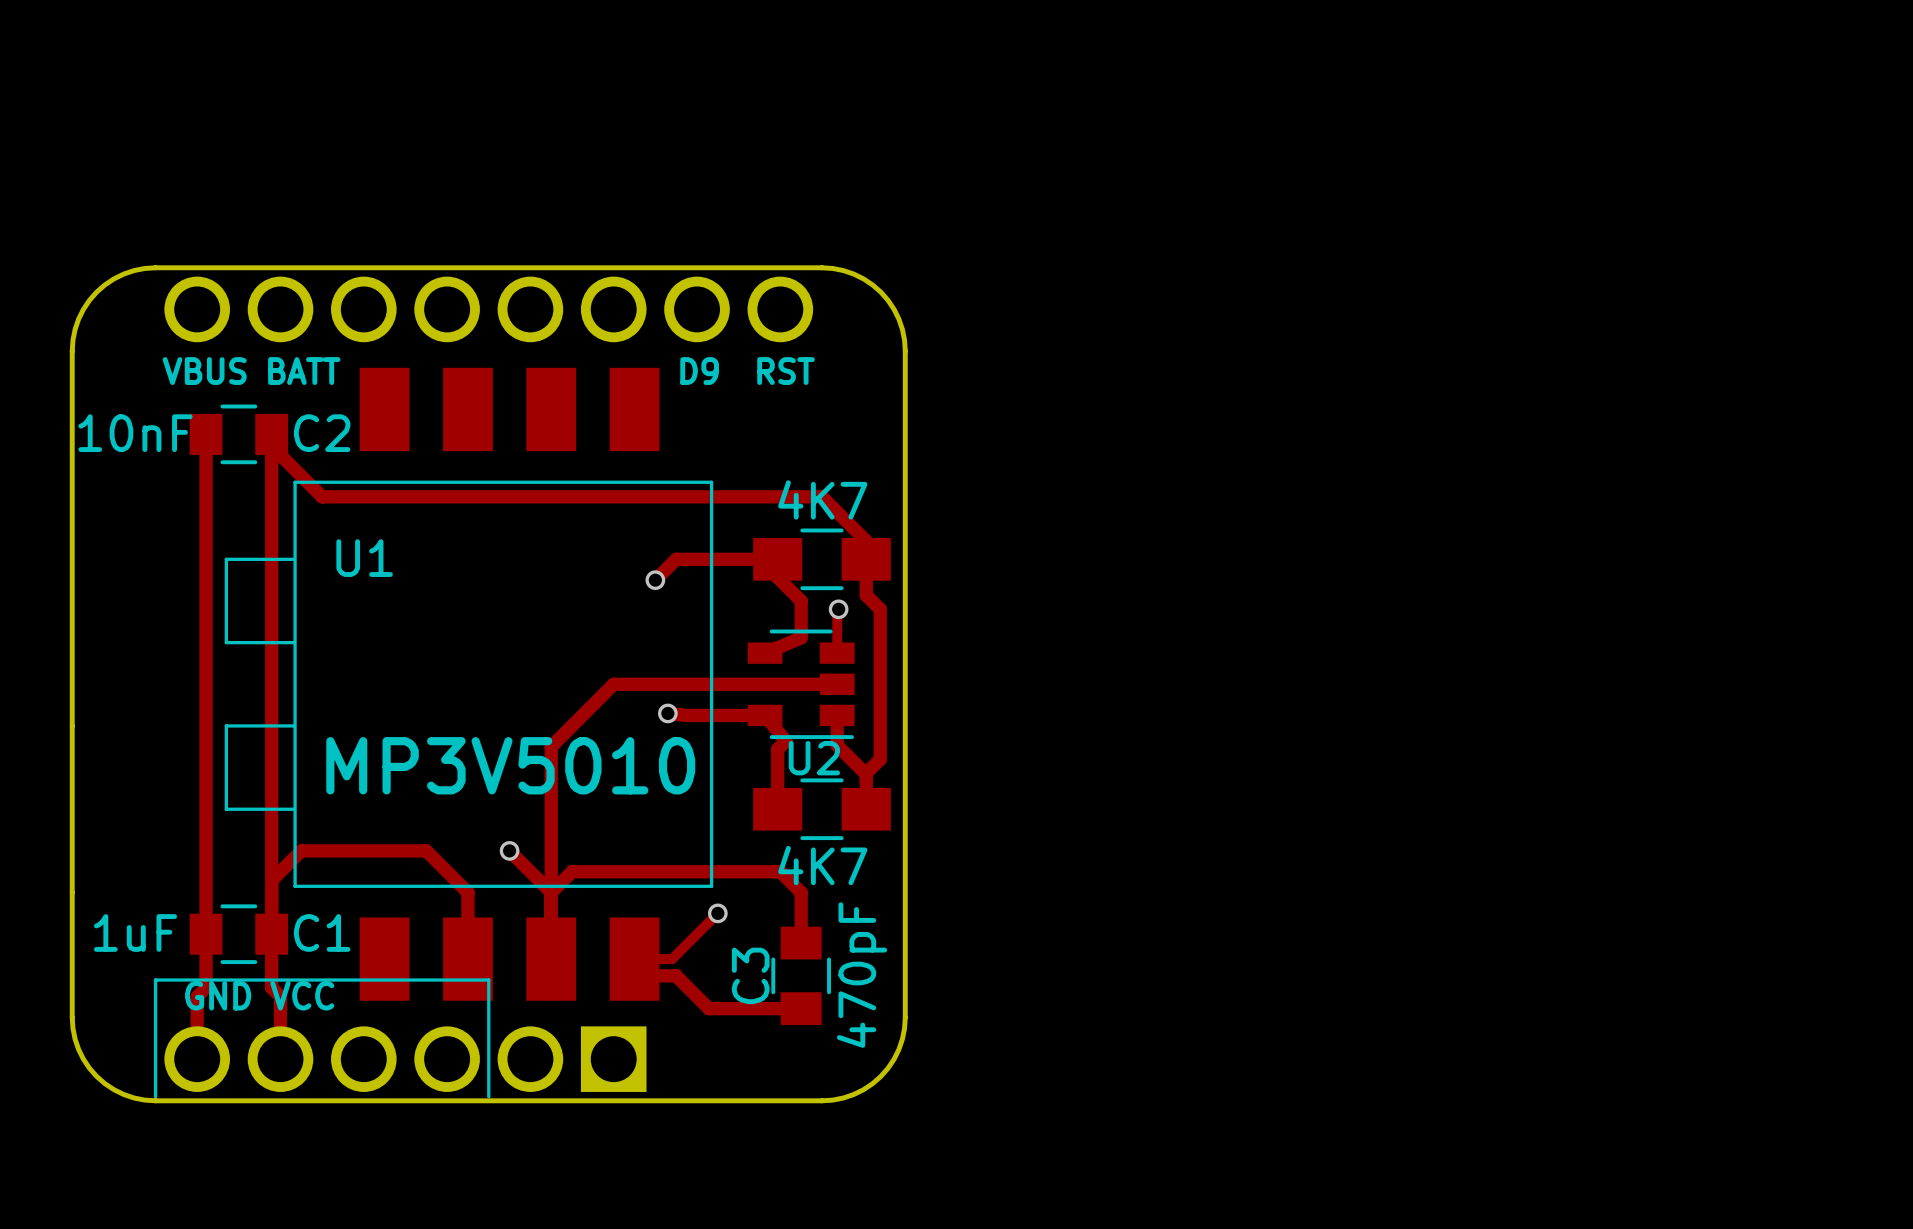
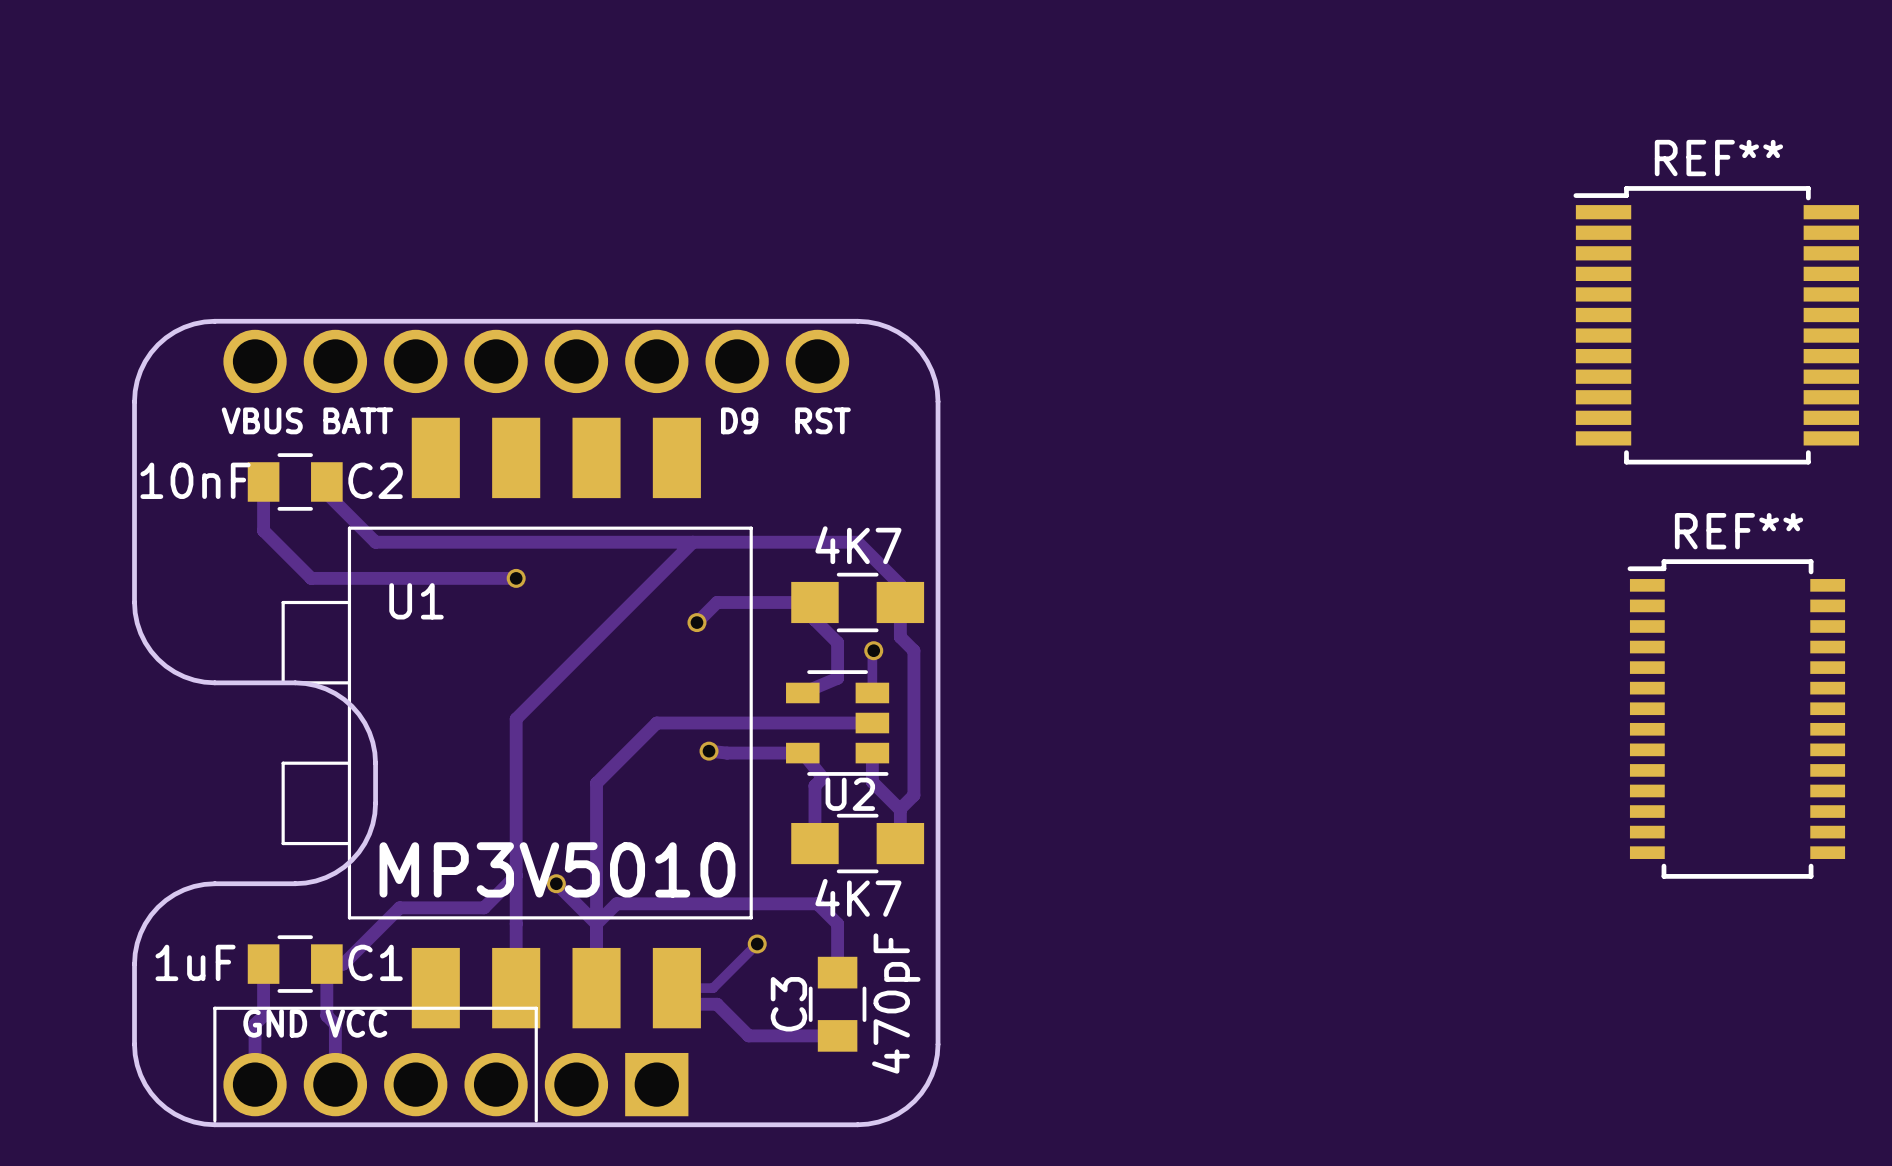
REF**: none -> (1716, 325)
track: (271, 446) (271, 934) -> (516, 875) (484, 907) (399, 907) (343, 964) (326, 964)
track: (206, 484) (206, 934) -> (263, 530) (311, 578) (516, 578)
via: none -> (516, 578)
board edge: (72, 559) (72, 934) -> (134, 602) (137, 623) (151, 651) (165, 666) (184, 676) (214, 682) (305, 683) (335, 693) (352, 706) (364, 723) (372, 742) (375, 763) (375, 803) (372, 824) (364, 843) (344, 867) (325, 877) (305, 883) (214, 883) (184, 889) (165, 900) (151, 915) (137, 943) (134, 964)
REF**: none -> (1736, 719)
U1 value position: MP3V5010 (510, 765) -> MP3V5010 (557, 869)
track: (271, 880) (301, 850) (426, 850) (467, 892) -> (692, 542) (516, 719) (516, 923)

